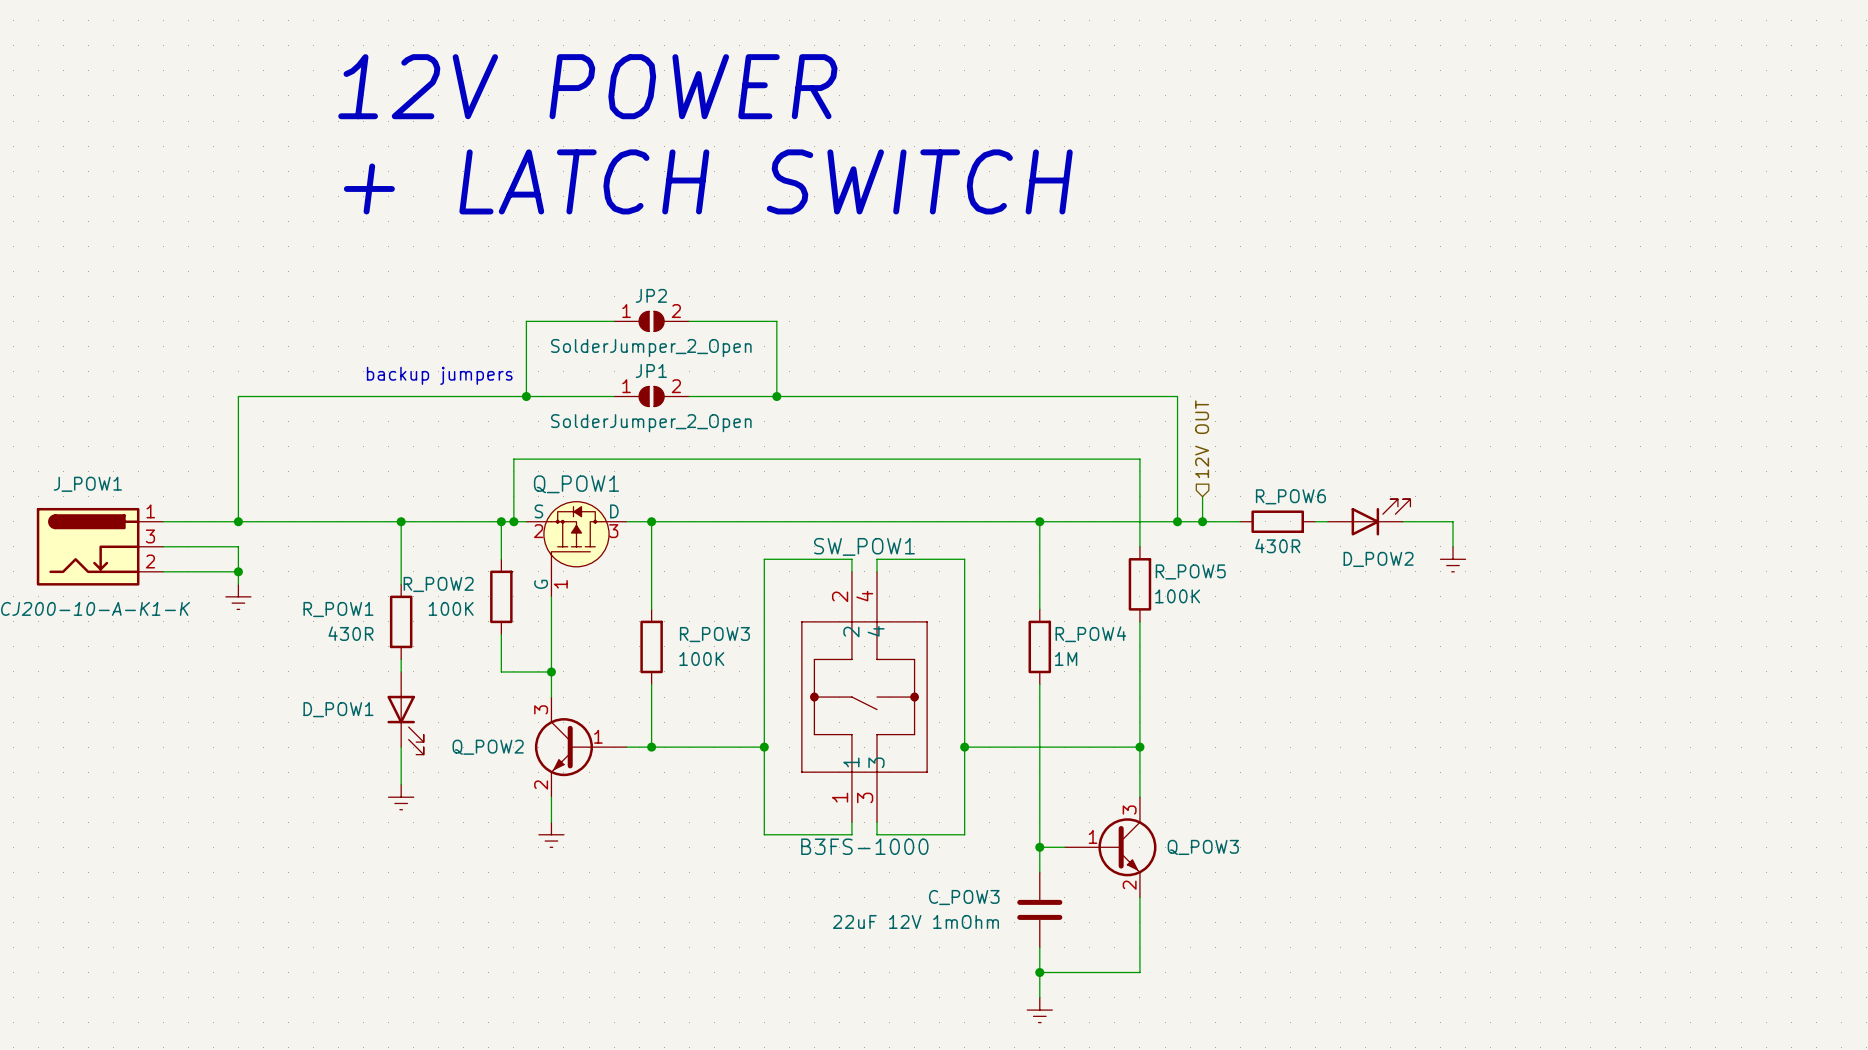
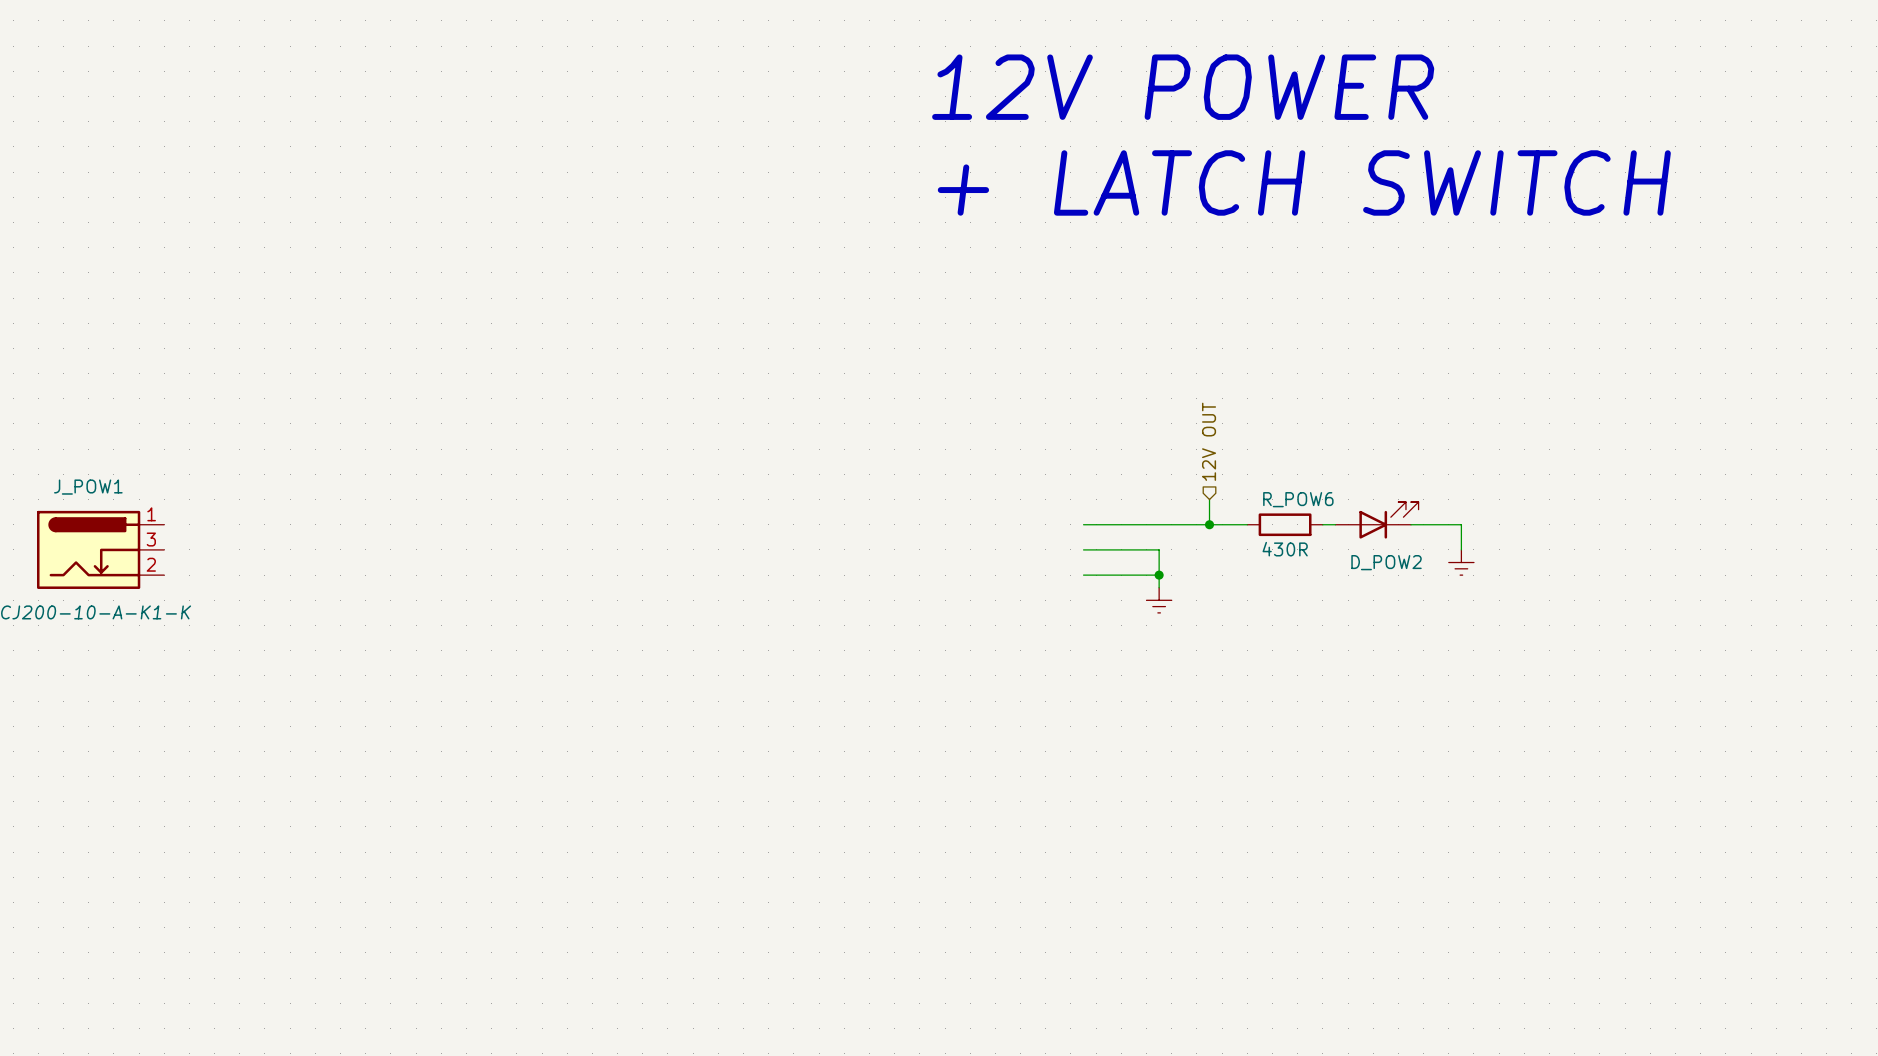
text: 12V POWER (587, 86) -> none
text: none -> 12V POWER (1183, 87)
text: + LATCH SWITCH (708, 181) -> none
text: none -> + LATCH SWITCH (1304, 182)
wire: (614, 321) (526, 321) (526, 396) -> none
JP2: SolderJumper_2_Open (651, 321) -> none
wire: (689, 321) (776, 321) (776, 396) -> none
text: backup jumpers (439, 375) -> none
junction: (526, 396) -> none
wire: (614, 396) (238, 396) (238, 521) -> none
JP1: SolderJumper_2_Open (651, 396) -> none
wire: (689, 396) (1177, 396) (1177, 521) -> none
junction: (776, 396) -> none
wire: (163, 521) (526, 521) -> none
junction: (238, 521) -> none
wire: (401, 521) (401, 584) -> none
junction: (401, 521) -> none
wire: (501, 521) (501, 559) -> none
junction: (501, 521) -> none
wire: (513, 521) (513, 459) (1139, 459) (1139, 546) -> none
junction: (513, 521) -> none
wire: (626, 521) (1077, 521) -> none
wire: (651, 521) (651, 609) -> none
junction: (651, 521) -> none
wire: (1039, 521) (1039, 609) -> none
junction: (1039, 521) -> none
junction position: (1177, 521) -> (1159, 575)
wire: (163, 546) (238, 546) (238, 584) -> none
wire: none -> (1083, 549) (1159, 549) (1159, 587)
Q_POW1: (576, 549) -> none
wire: (163, 571) (238, 571) -> none
junction: (238, 571) -> none
wire: (851, 571) (851, 559) (764, 559) (764, 834) (851, 834) (851, 822) -> none
wire: (877, 571) (877, 559) (964, 559) (964, 834) (877, 834) (877, 822) -> none
wire: none -> (1083, 575) (1159, 575)
R_POW5: 100K (1139, 584) -> none
power symbol: (238, 596) -> none
R_POW2: 100K (501, 596) -> none
wire: (551, 596) (551, 697) -> none
power symbol: none -> (1159, 600)
R_POW1: 430R (401, 621) -> none
wire: (1139, 621) (1139, 797) -> none
wire: (501, 634) (501, 671) (551, 671) -> none
R_POW3: 100K (651, 646) -> none
R_POW4: 1M (1039, 646) -> none
wire: (401, 659) (401, 671) -> none
junction: (551, 671) -> none
wire: (651, 684) (651, 747) -> none
wire: (1039, 684) (1039, 872) -> none
SW_POW1: B3FS-1000 (864, 697) -> none
D_POW1: (405, 713) -> none
wire: (401, 747) (401, 784) -> none
Q_POW2: (580, 747) -> none
wire: (626, 747) (764, 747) -> none
junction: (651, 747) -> none
junction: (764, 747) -> none
wire: (964, 747) (1139, 747) -> none
junction: (964, 747) -> none
junction: (1139, 747) -> none
power symbol: (401, 797) -> none
wire: (551, 797) (551, 822) -> none
power symbol: (551, 834) -> none
wire: (1039, 847) (1064, 847) -> none
junction: (1039, 847) -> none
Q_POW3: (1110, 847) -> none
wire: (1139, 897) (1139, 972) (1039, 972) -> none
C_POW3: 22uF 12V 1mOhm (1039, 909) -> none
wire: (1039, 947) (1039, 997) -> none
junction: (1039, 972) -> none
power symbol: (1039, 1010) -> none

